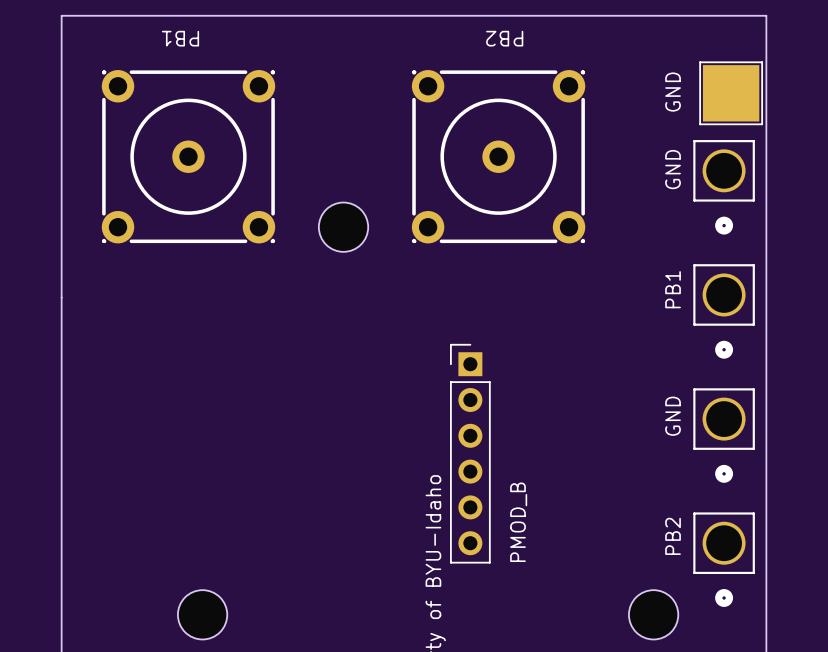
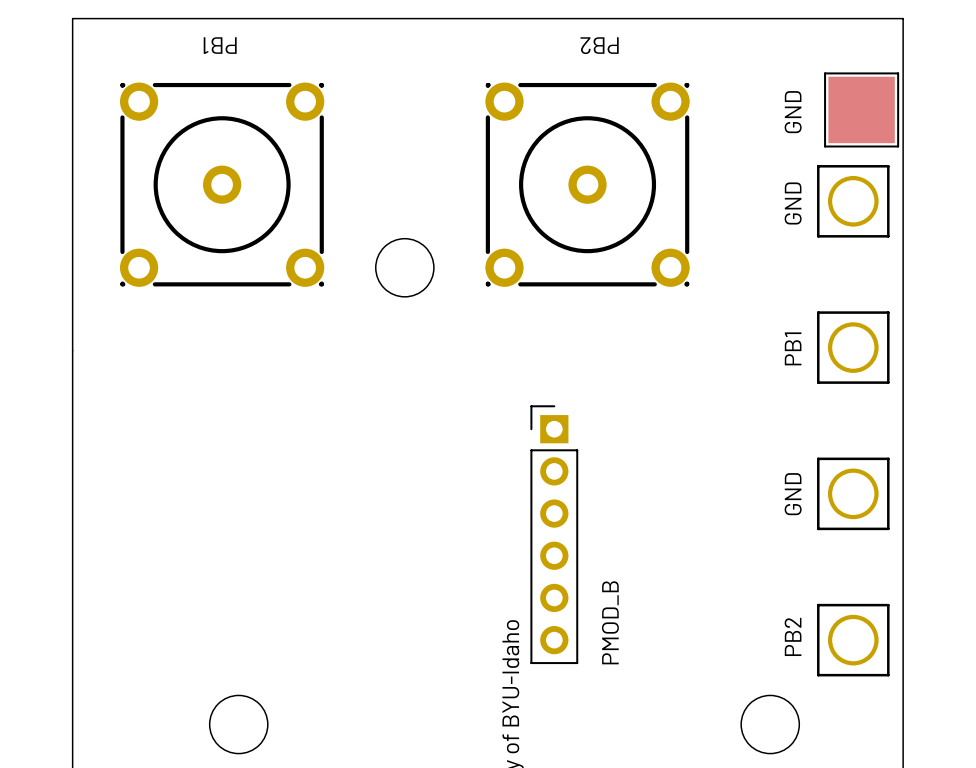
part: (724, 187) -> none
part: (724, 311) -> none
part: (724, 435) -> none
part: (724, 559) -> none

